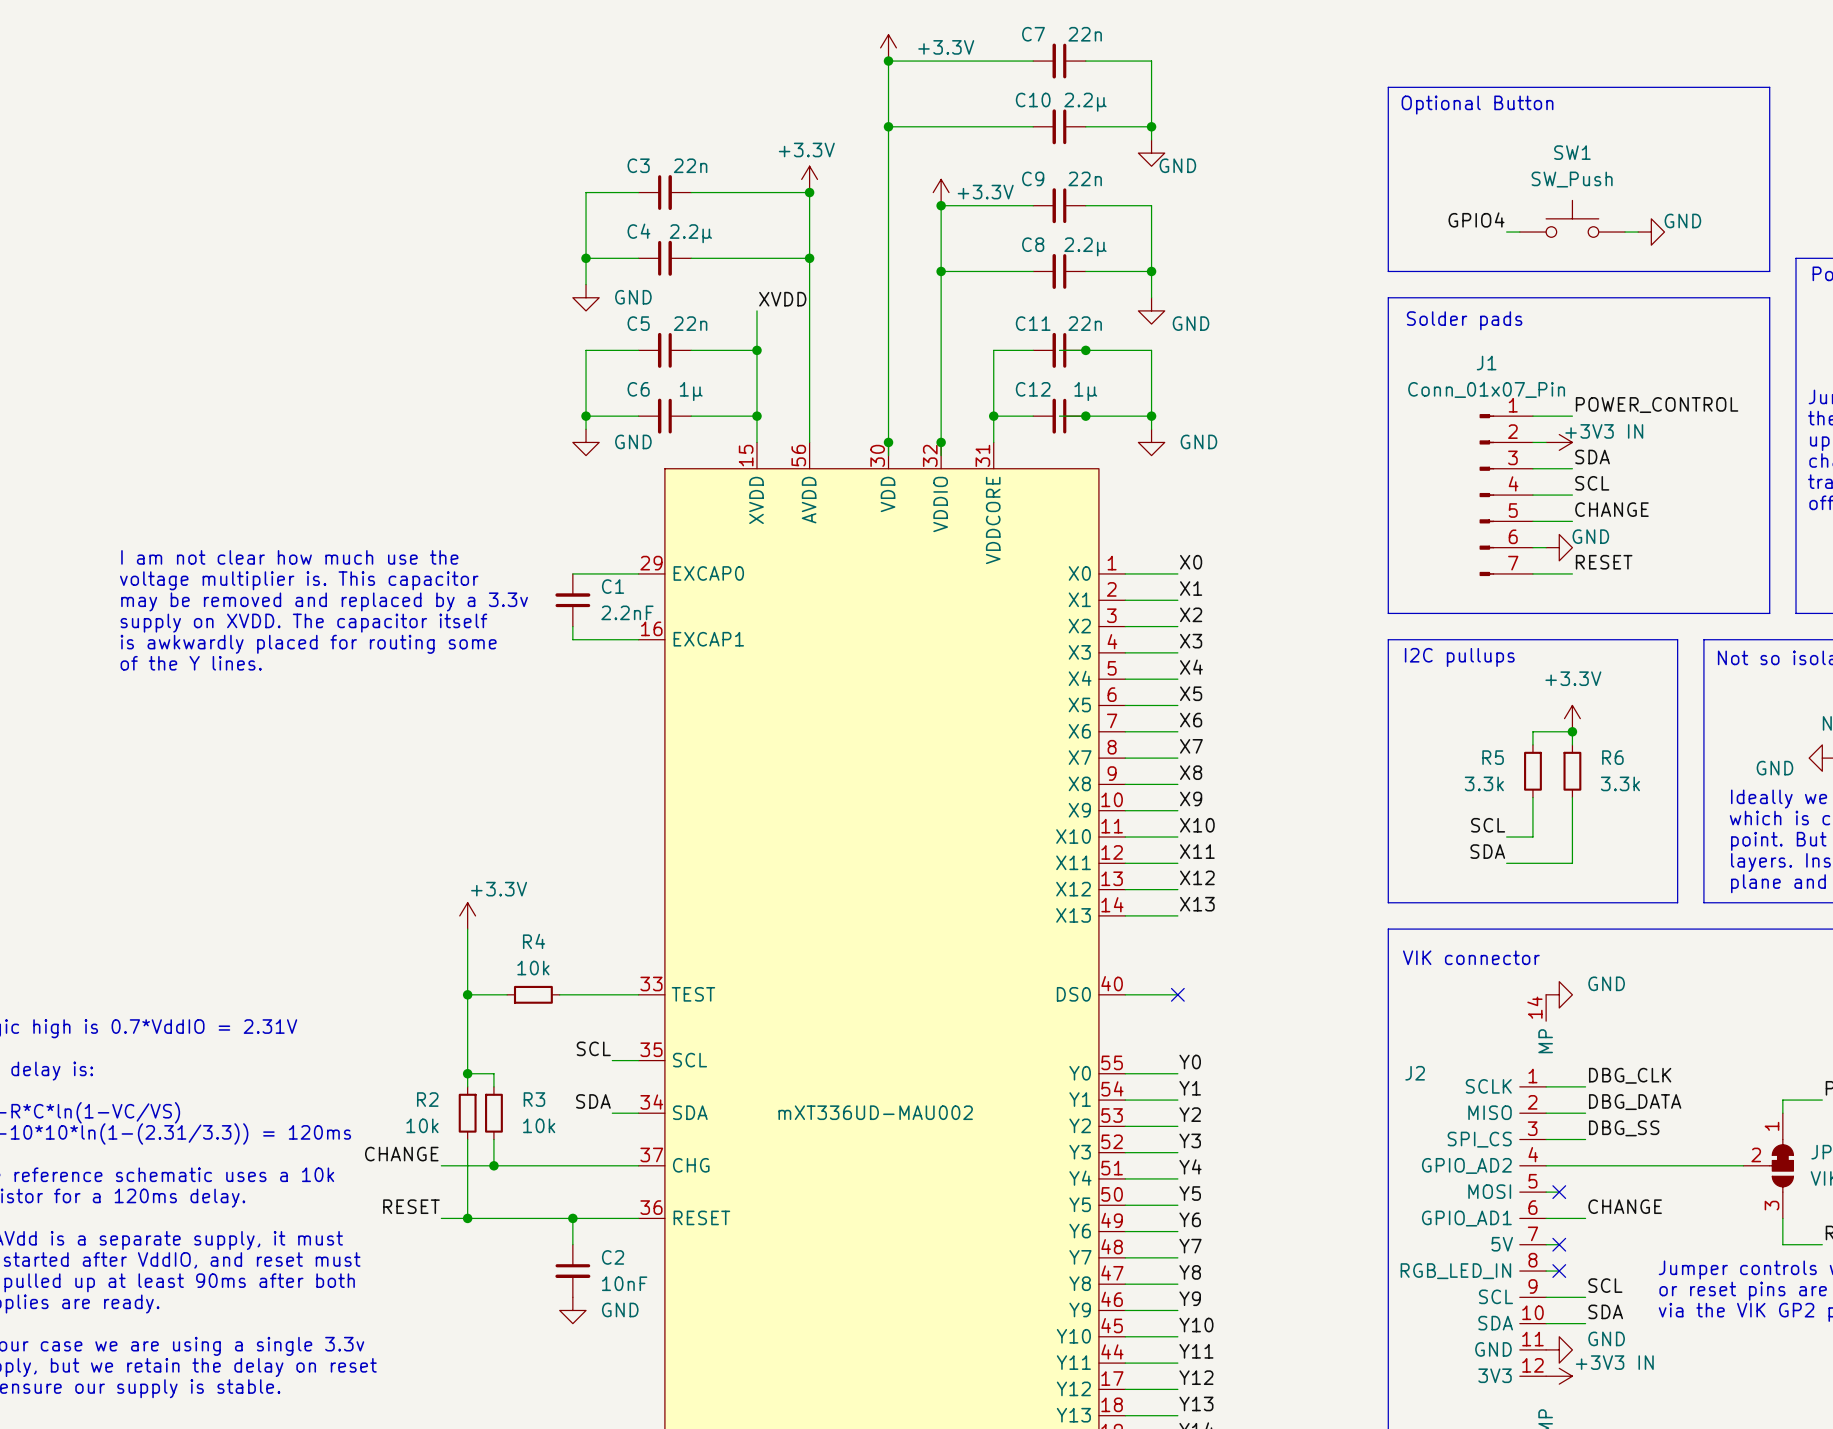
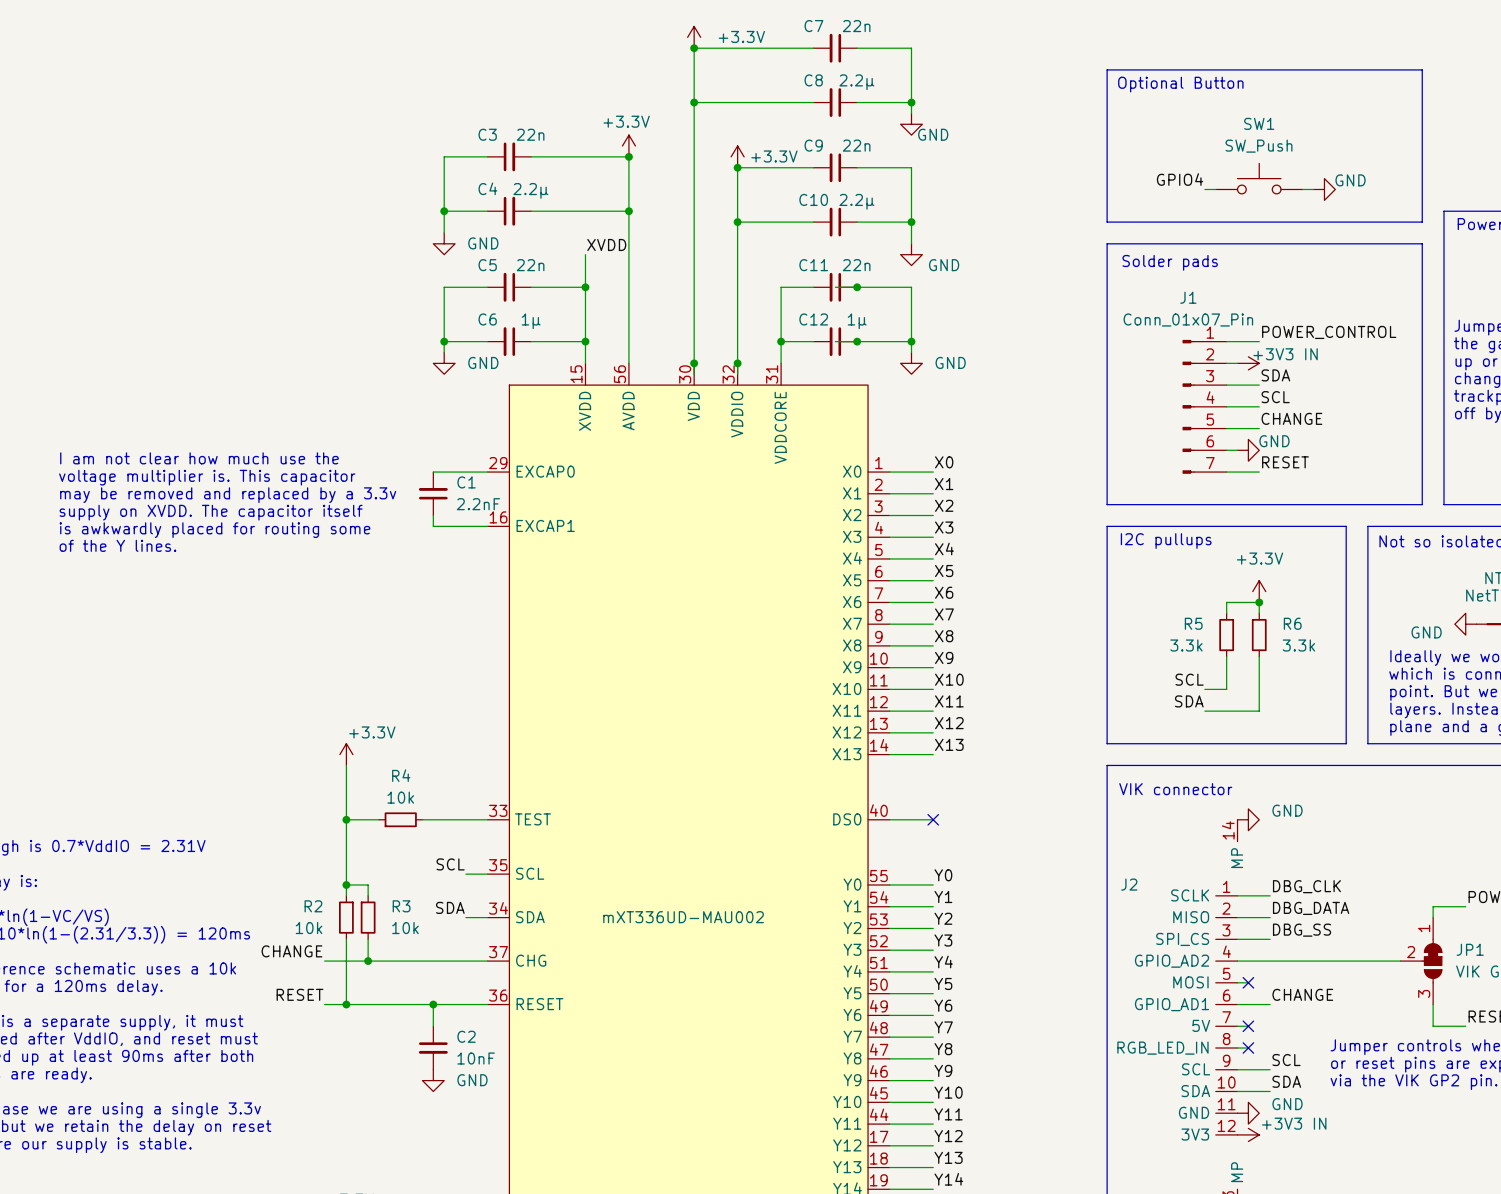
C10 name: C10 (1033, 100) -> C8 (813, 80)
C8 name: C8 (1033, 244) -> C10 (813, 199)

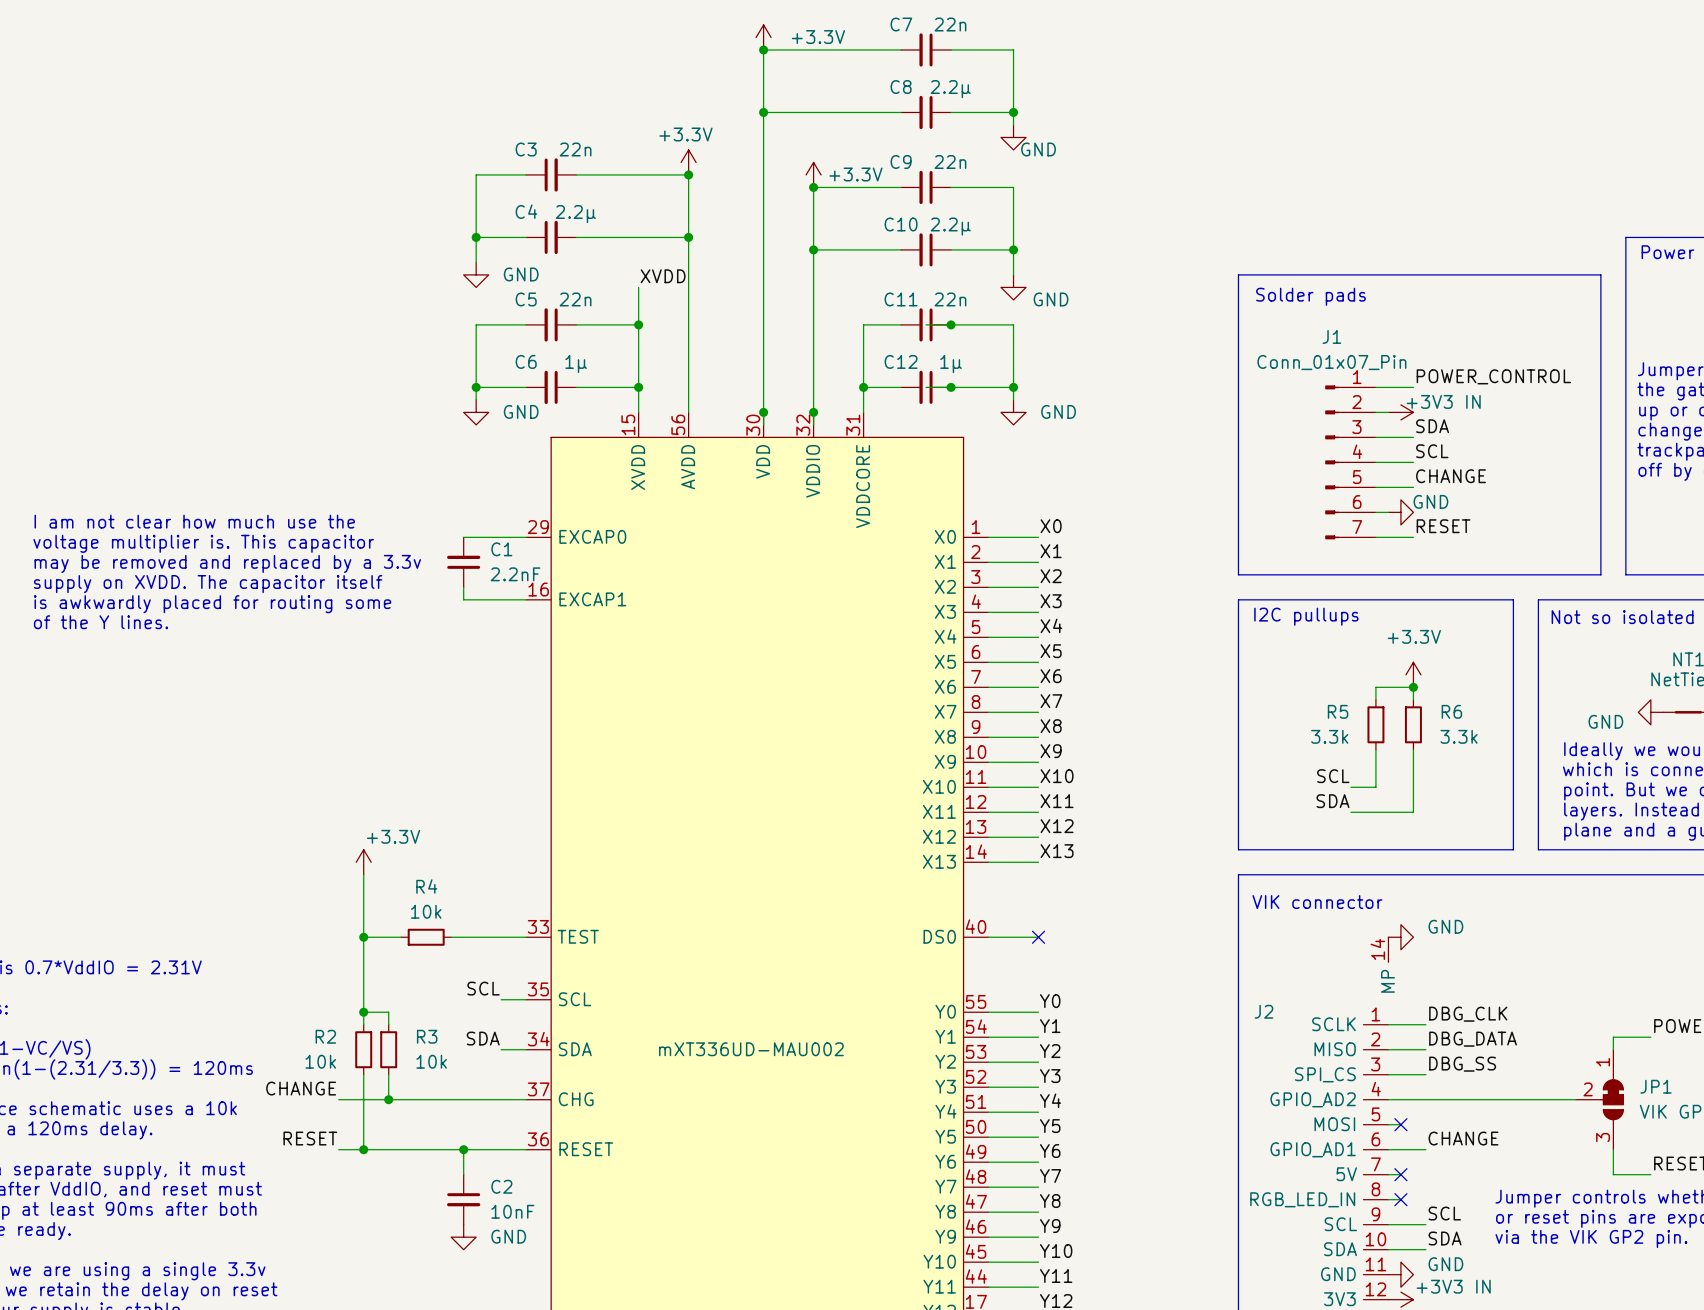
line: (1107, 69) (1422, 69) (1422, 222) (1107, 222) (1107, 69) -> none
text: Optional Button (1180, 84) -> none
SW1: SW_Push (1259, 178) -> none
label: GPIO4 (1179, 179) -> none
wire: (1204, 189) (1215, 189) -> none
wire: (1302, 189) (1313, 189) -> none
power symbol: GND (1324, 189) -> none

